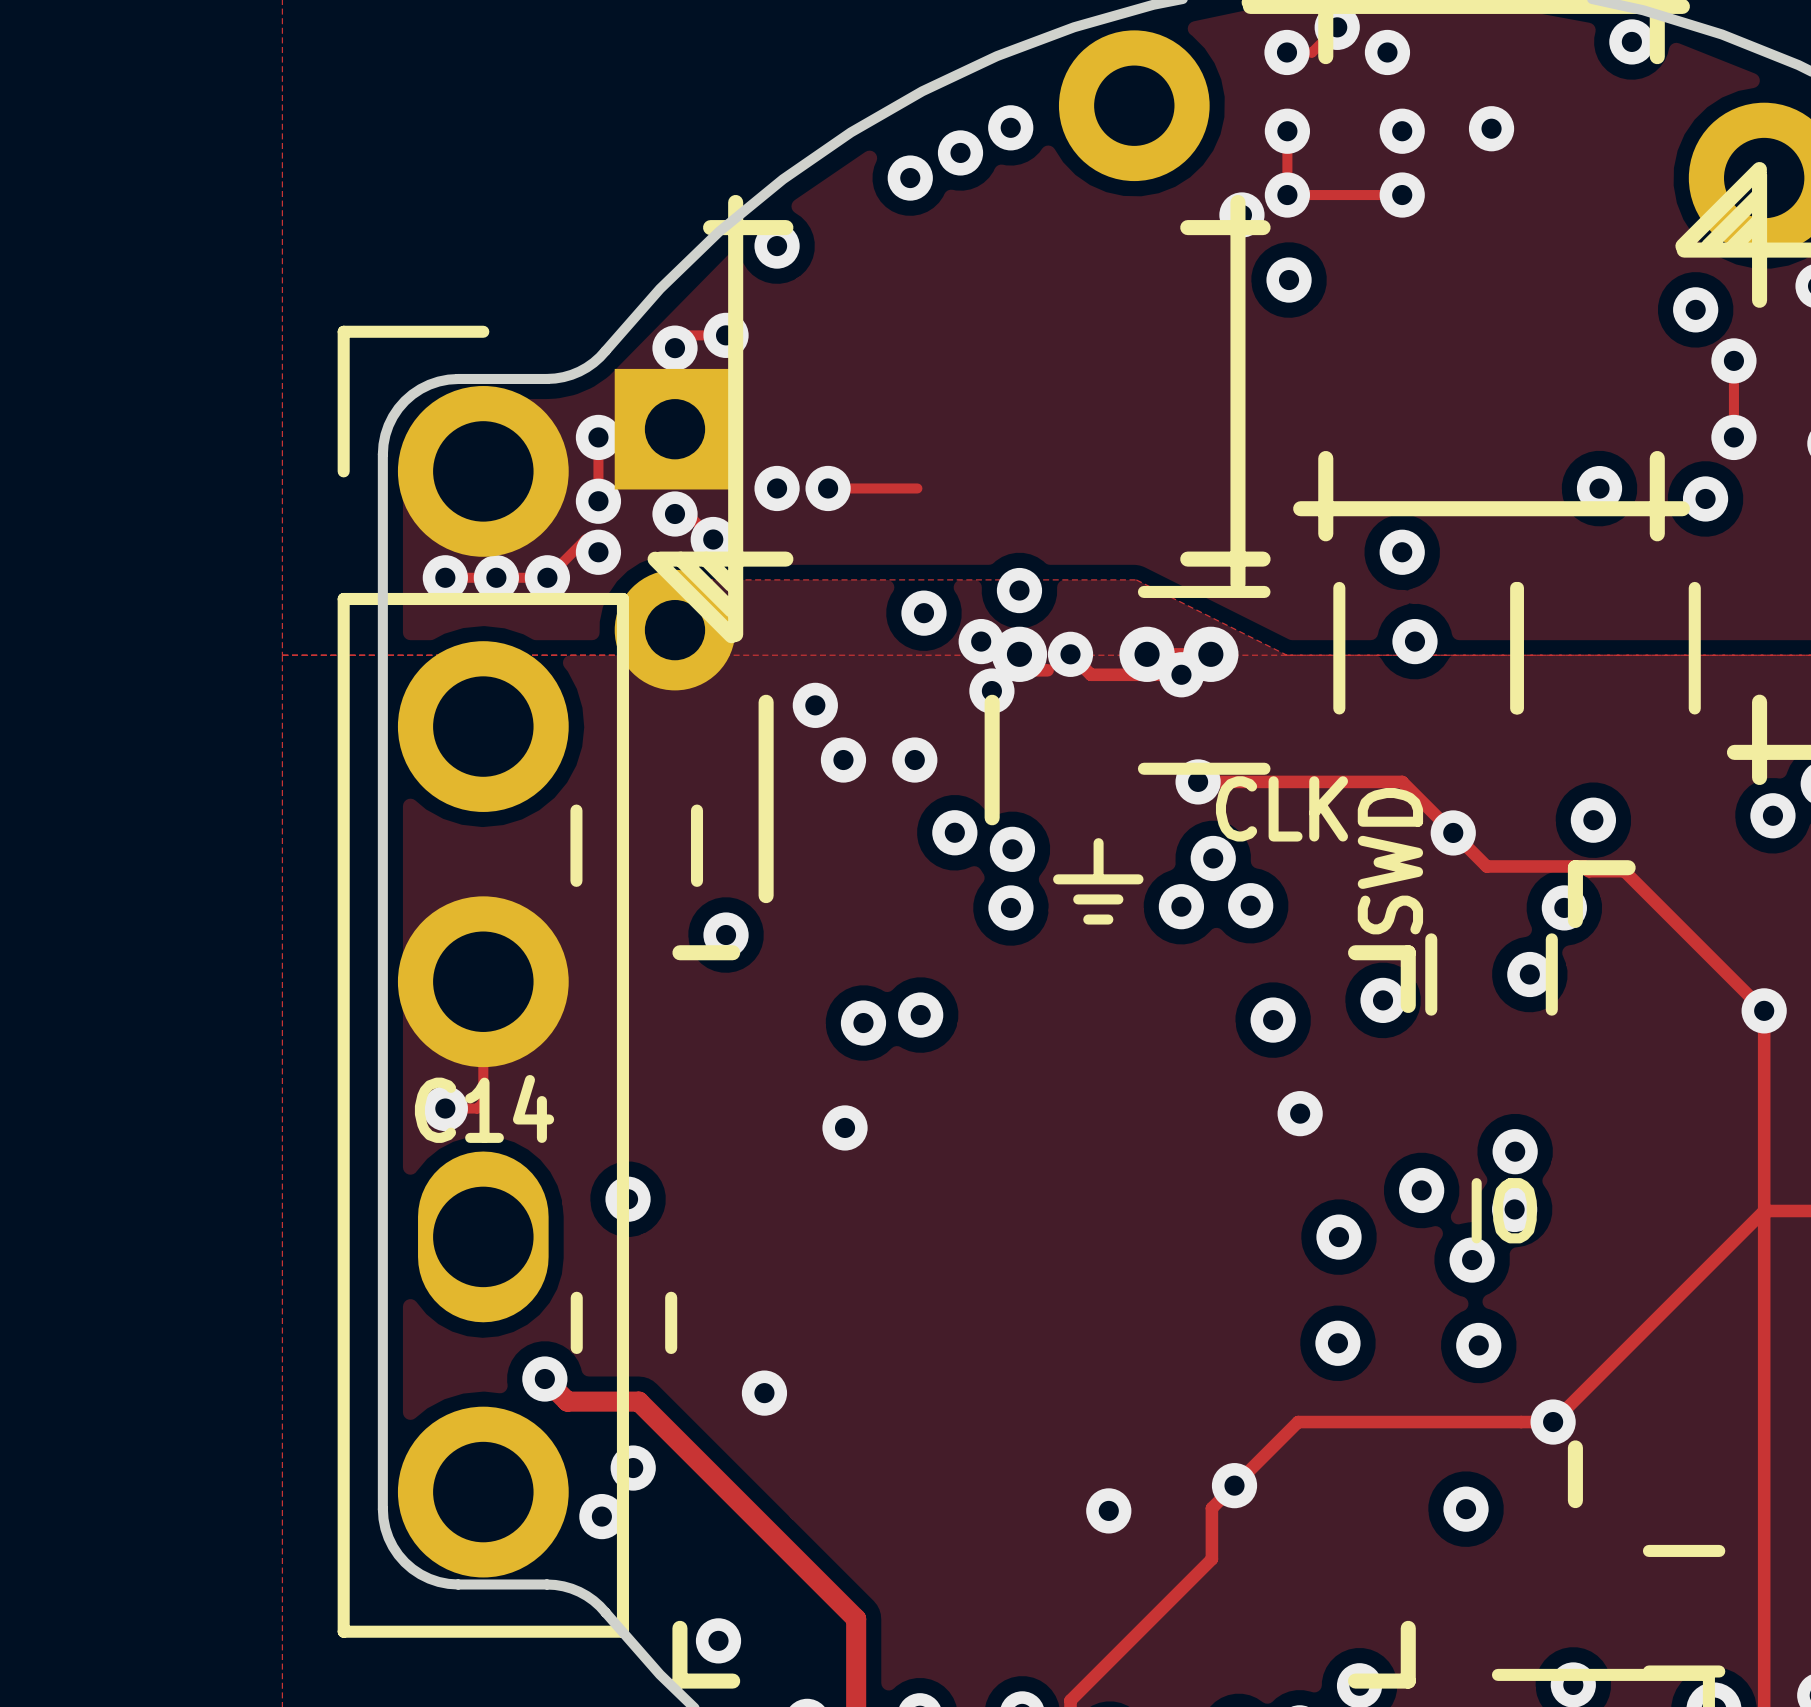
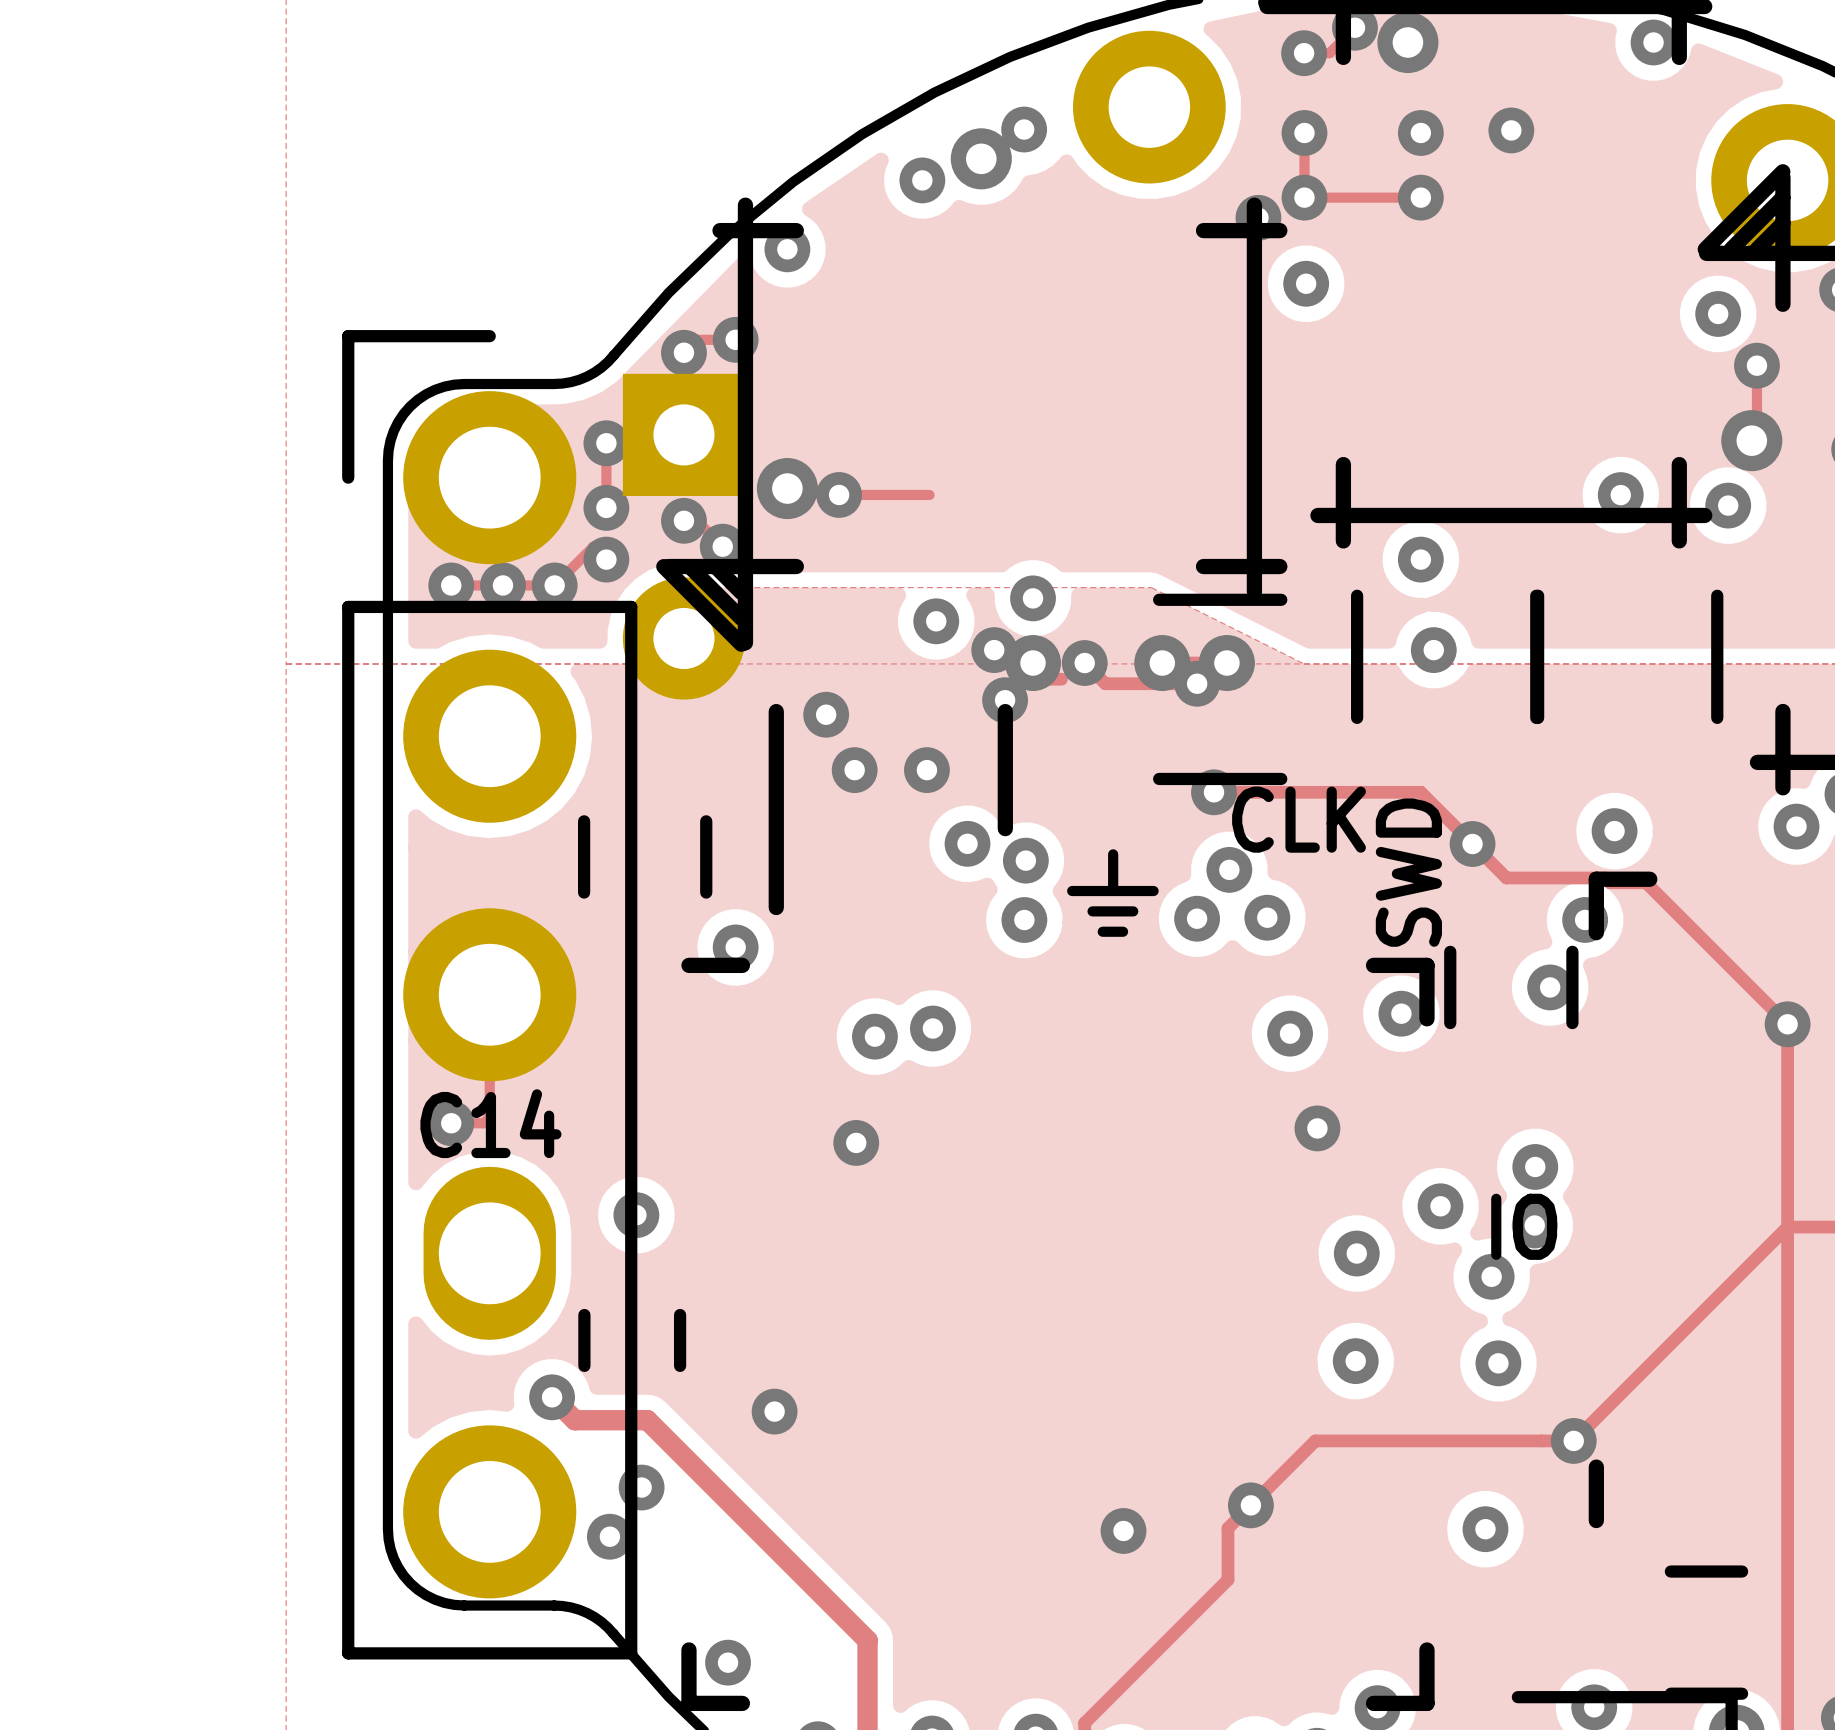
via size: [1364, 29, 1411, 76] -> [1377, 11, 1439, 74]
via size: [937, 130, 984, 176] -> [950, 128, 1012, 190]
via size: [1711, 414, 1757, 461] -> [1721, 410, 1783, 472]
via size: [754, 465, 800, 512] -> [756, 458, 818, 520]

